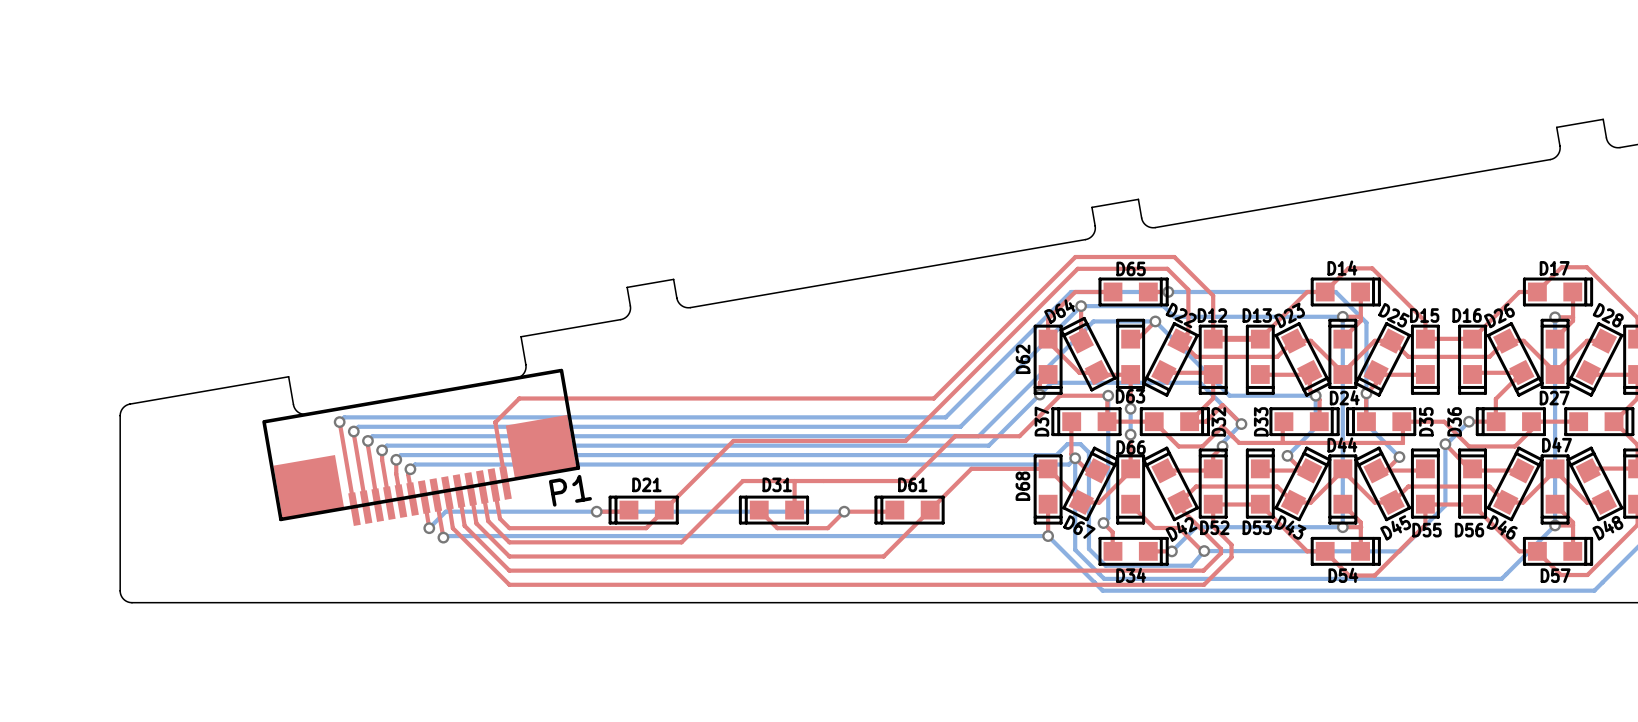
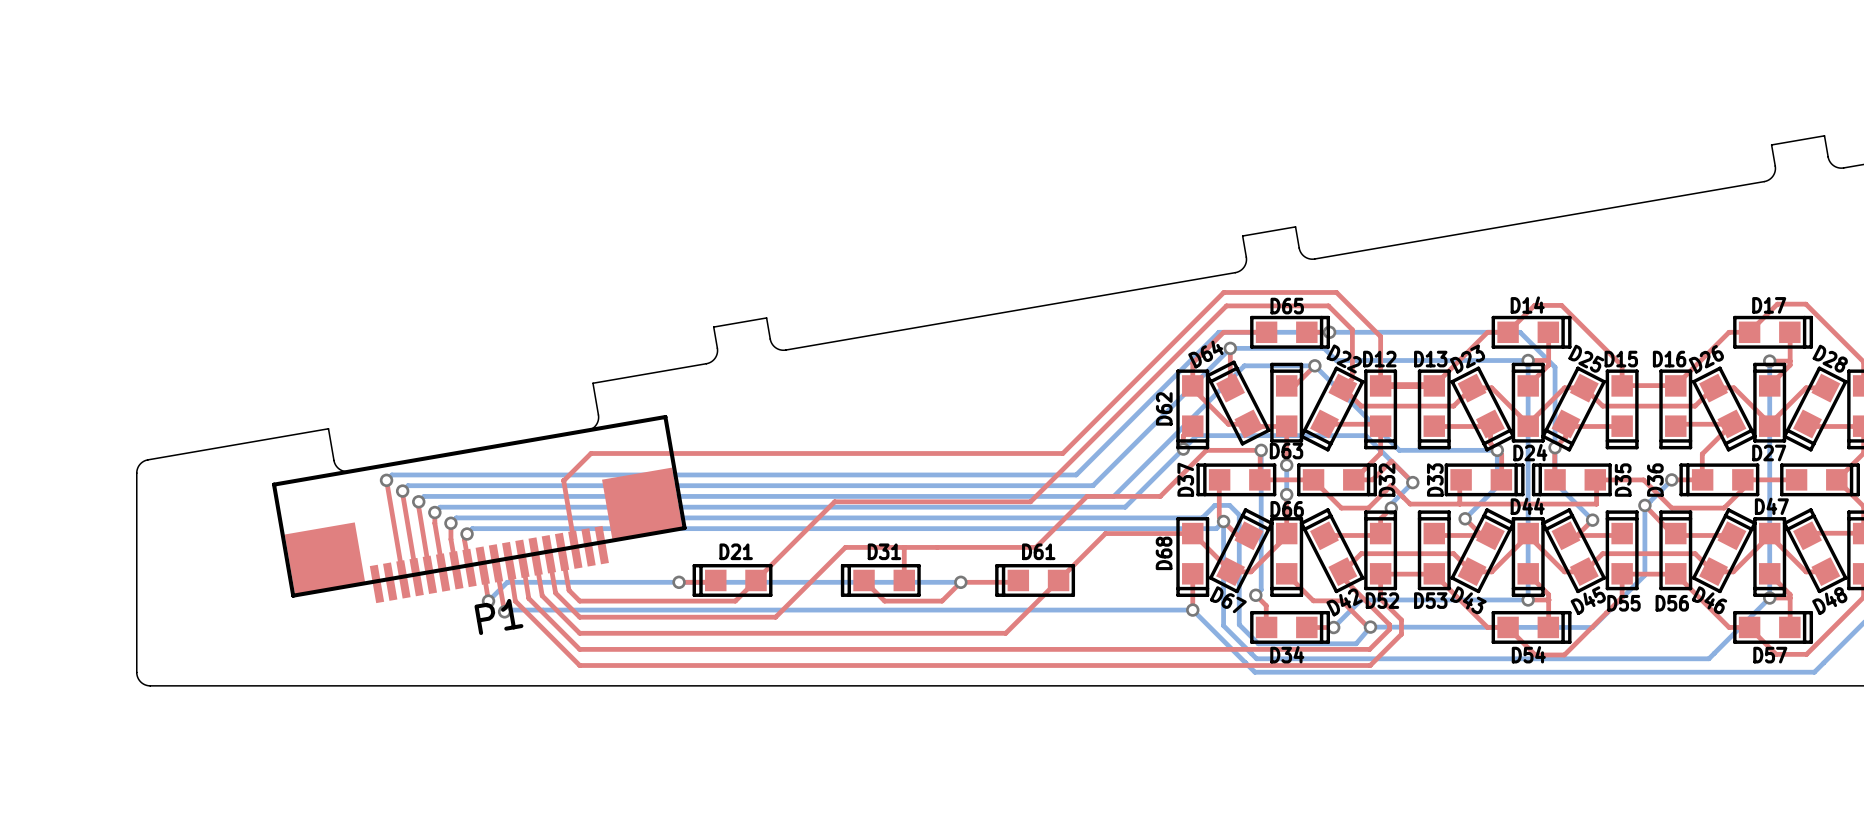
P1 footprint: [262, 368, 581, 526] -> [272, 415, 687, 604]
P1 name position: P1 (570, 490) -> P1 (498, 616)

